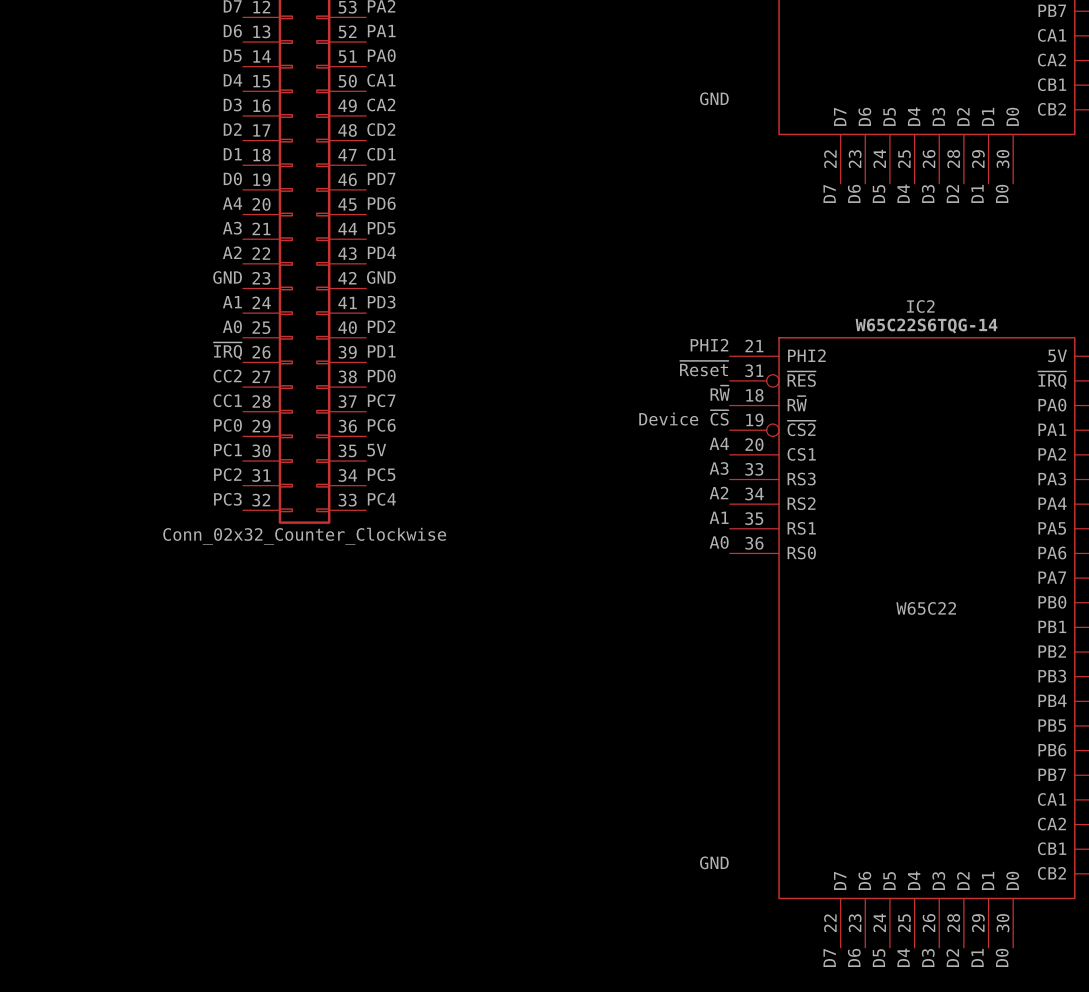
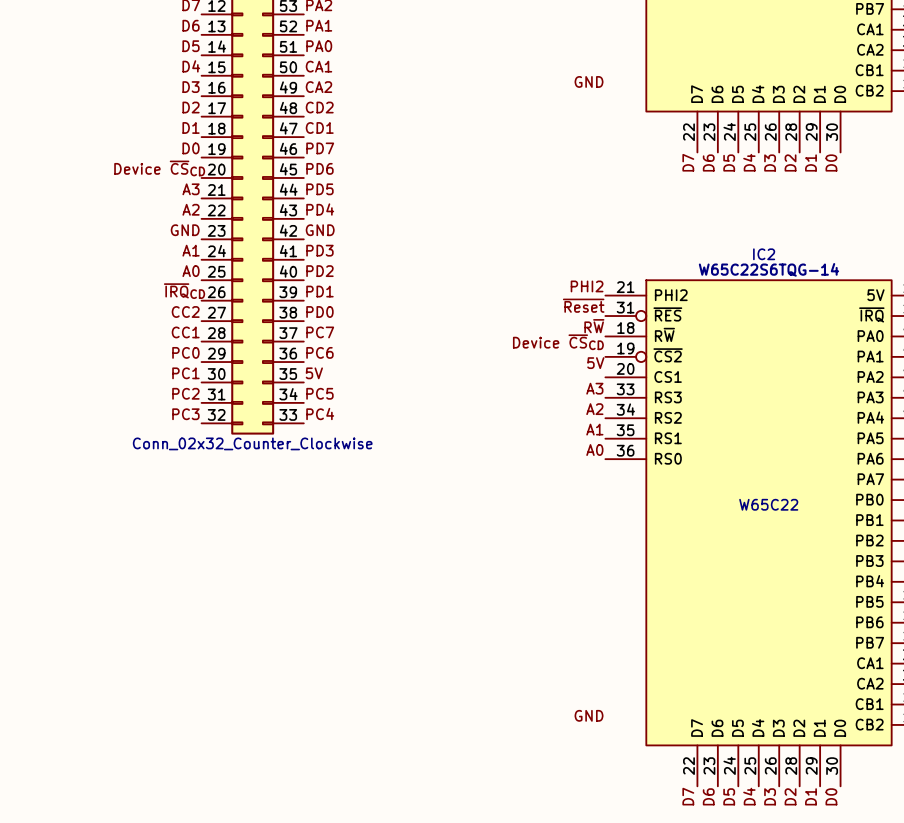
label: A4 (232, 203) -> Device ~{CS}CD (159, 168)
label: ~{IRQ} (227, 351) -> ~{IRQ}CD (184, 291)
label: Device ~{CS} (683, 417) -> Device ~{CS}CD (558, 342)
label: A4 (719, 443) -> 5V (595, 363)

